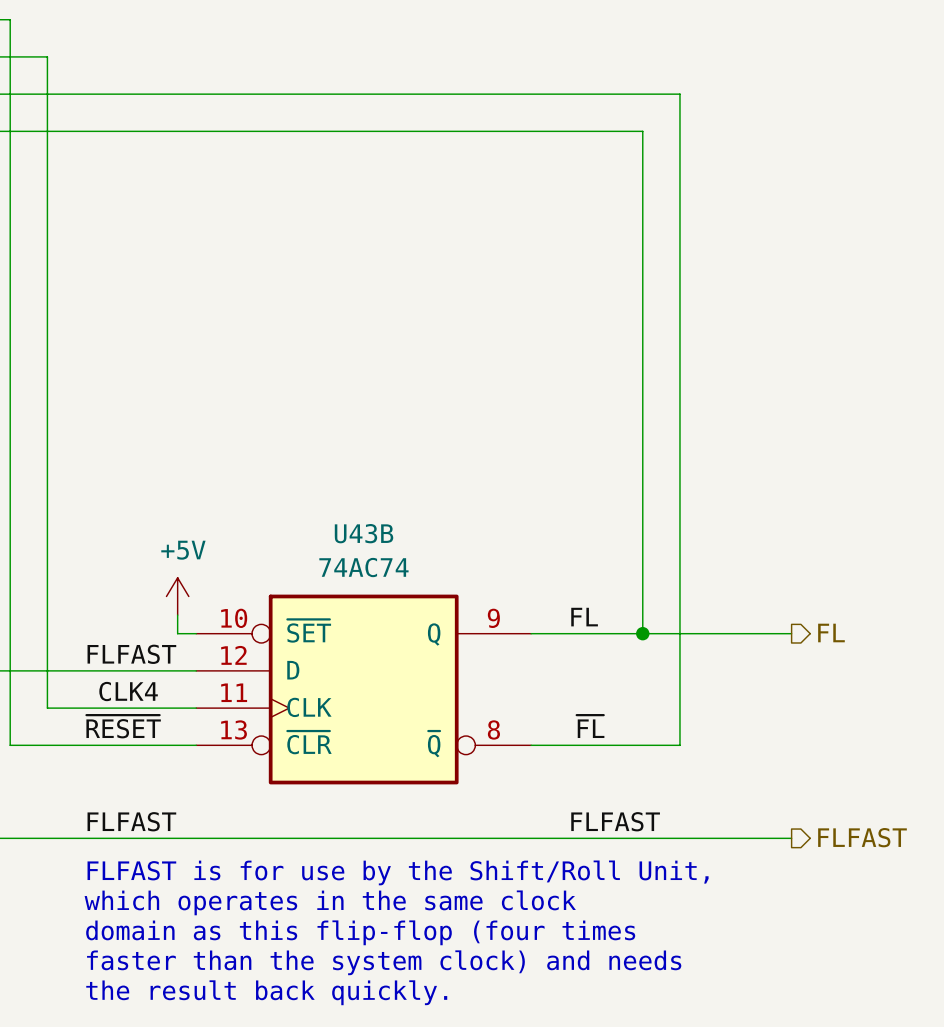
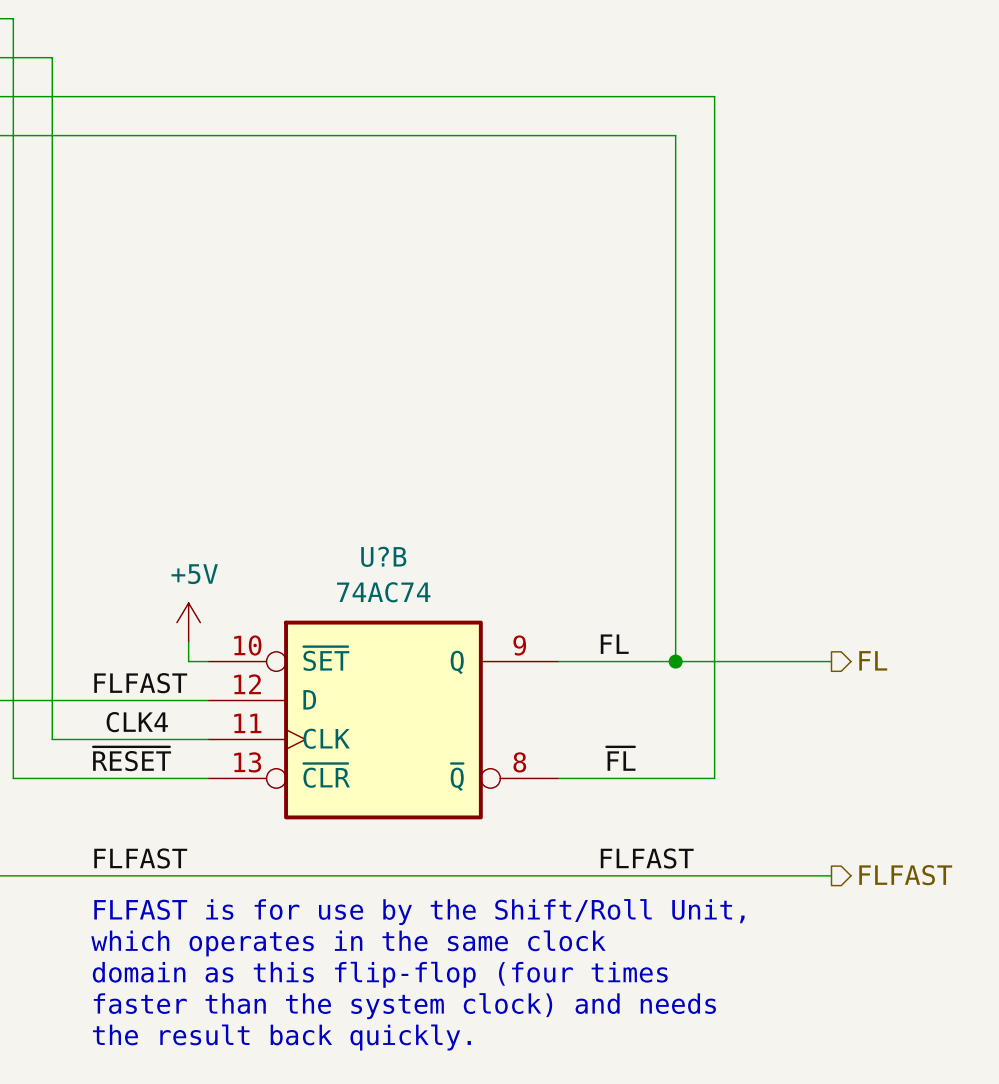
U43B name: U43B (364, 533) -> U?B (383, 556)

